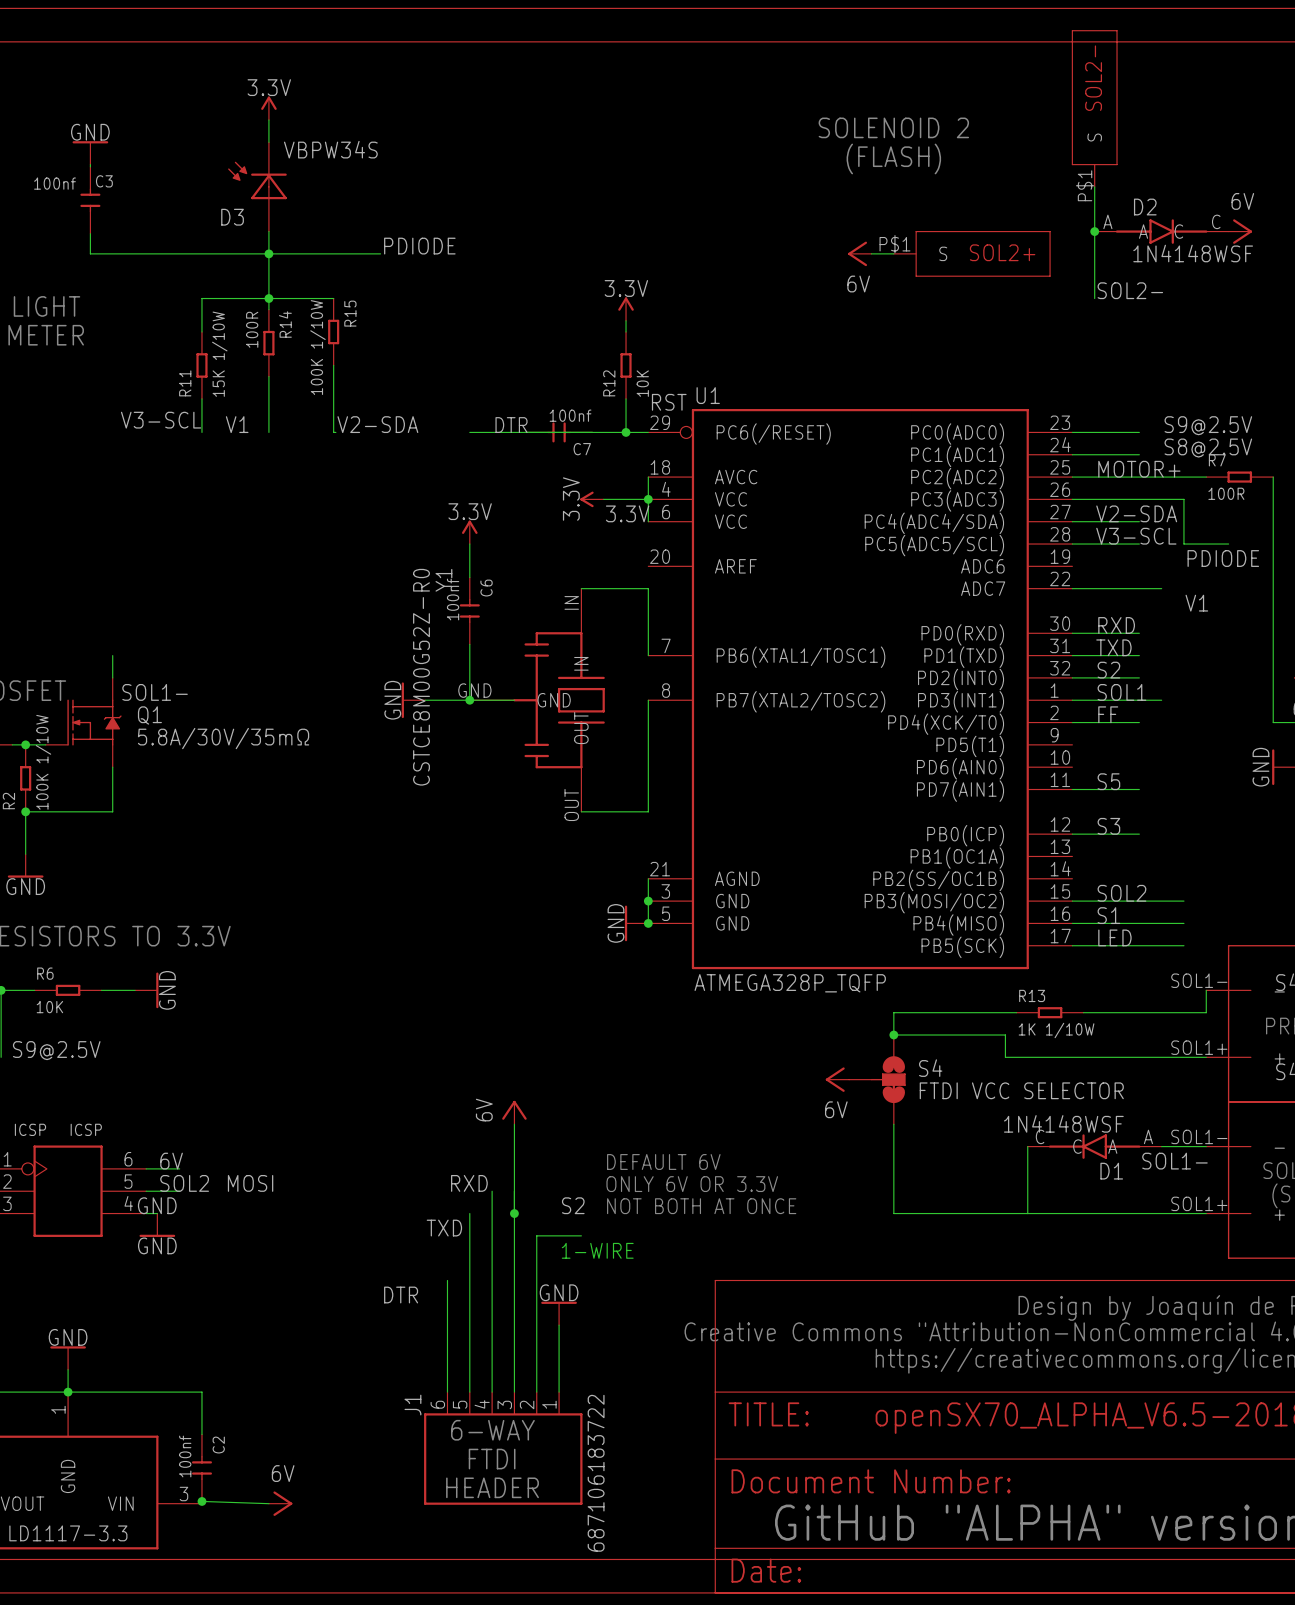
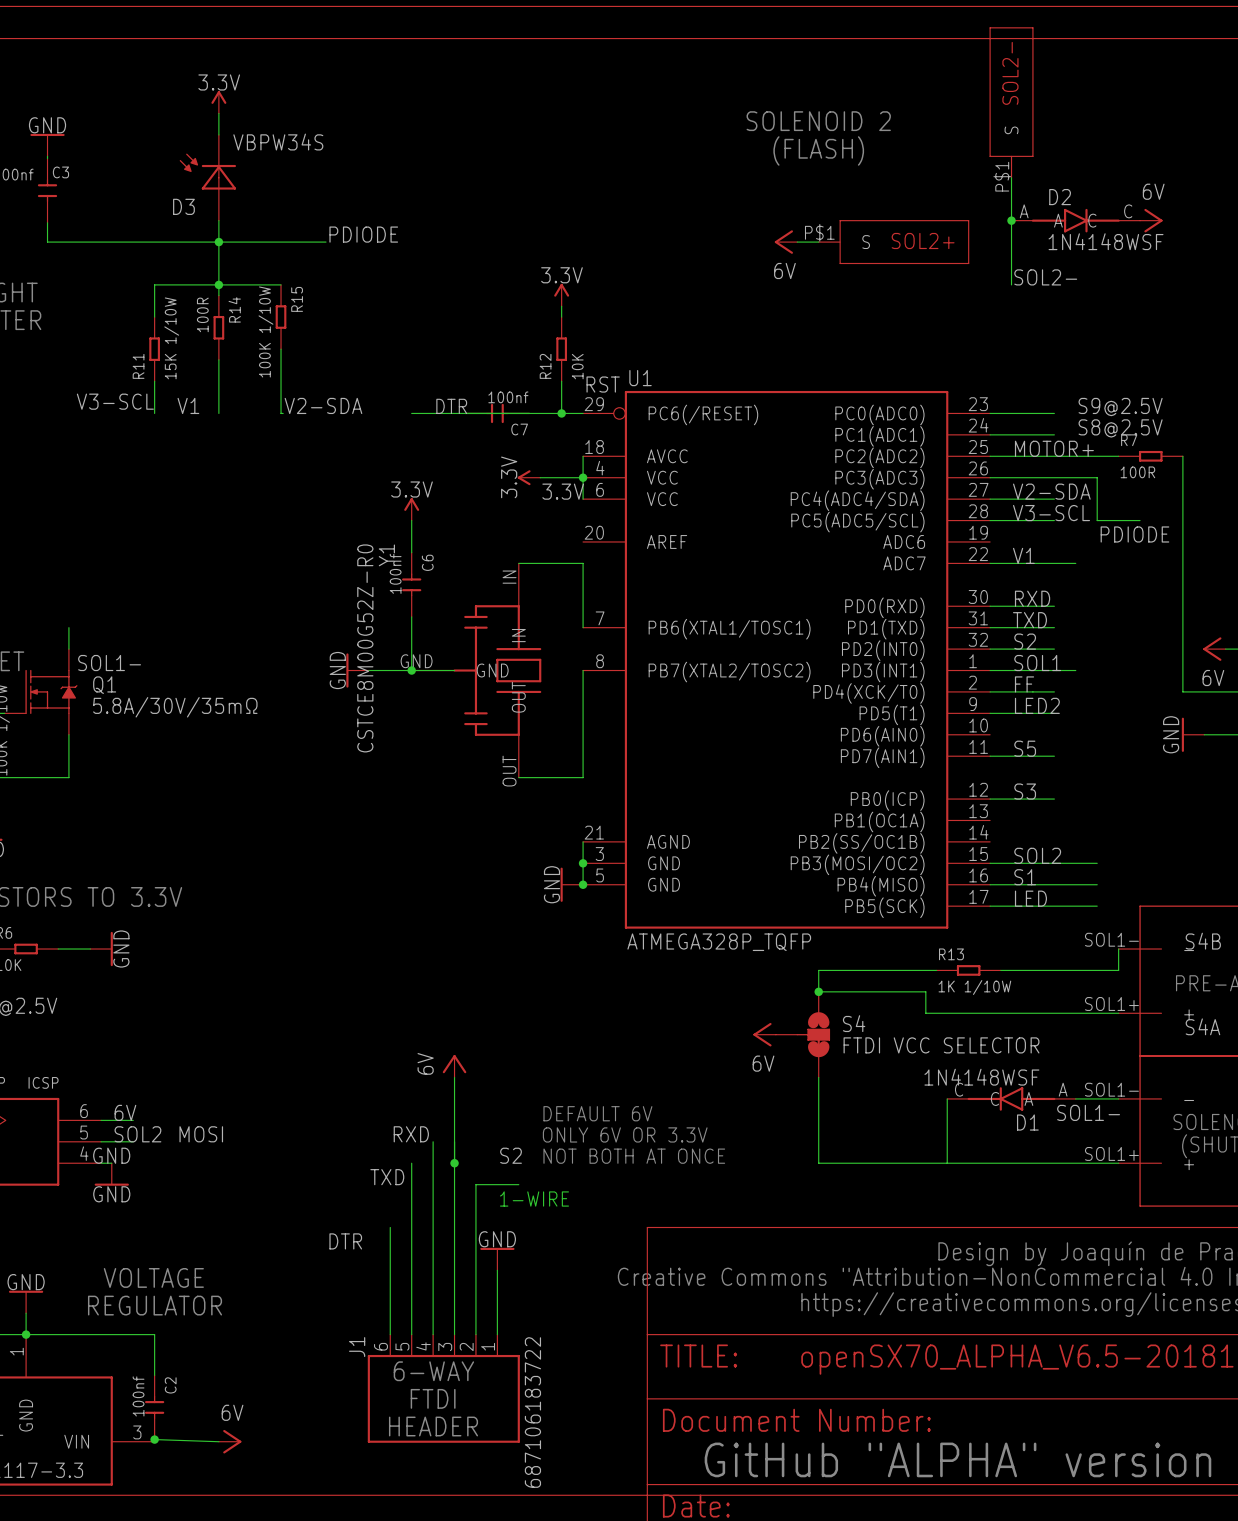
label position: V1 (1196, 603) -> V1 (1023, 555)
label: none -> LED2 (1037, 705)
wire: none -> (990, 713) (1054, 713)
text: none -> VOLTAGE (153, 1277)
text: none -> REGULATOR (155, 1305)

